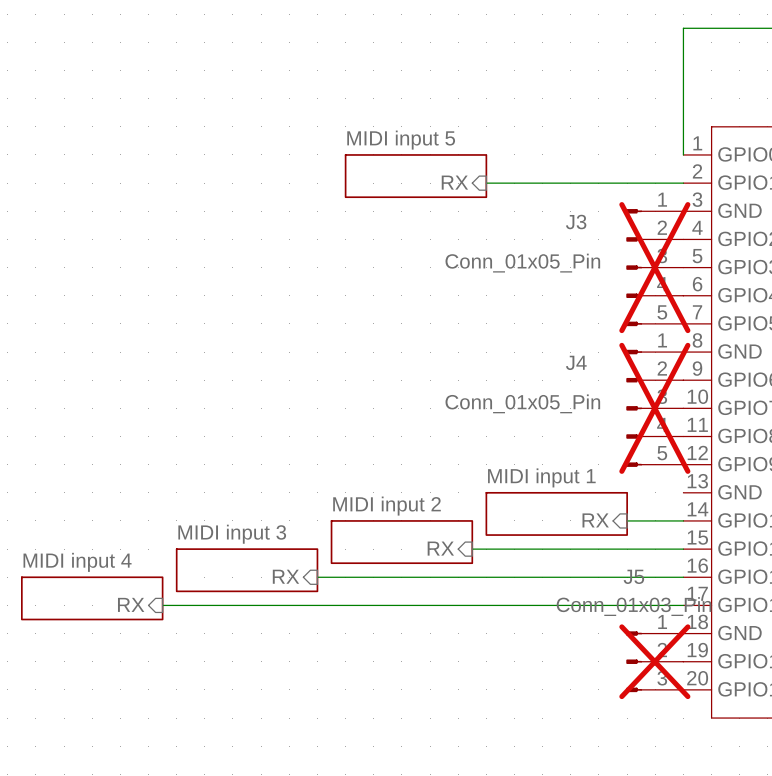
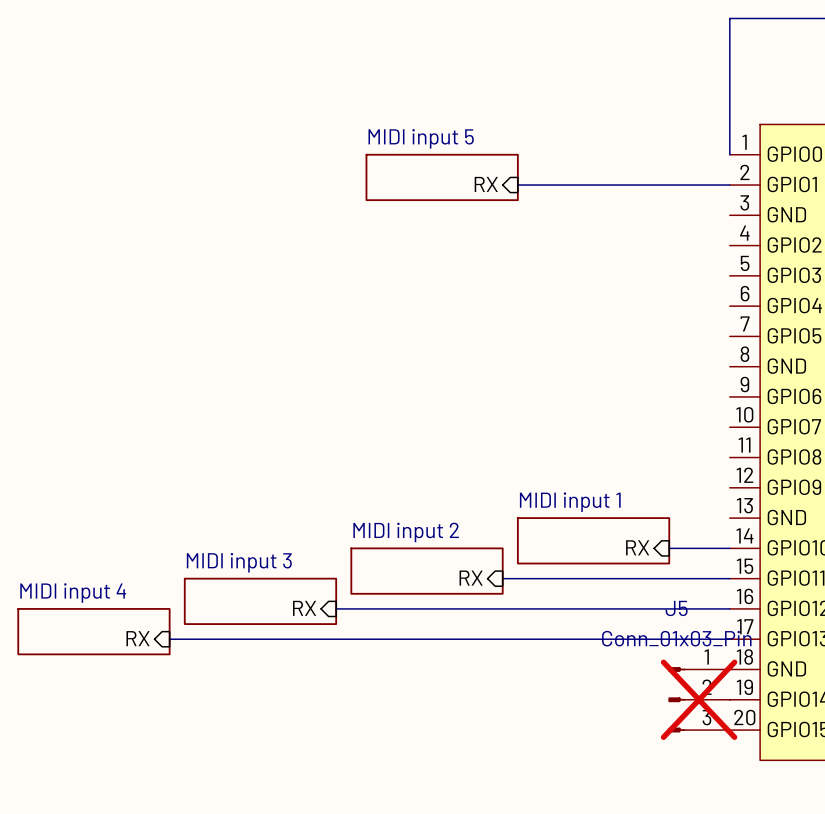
J3: Conn_01x05_Pin (654, 267) -> none
J4: Conn_01x05_Pin (654, 408) -> none

